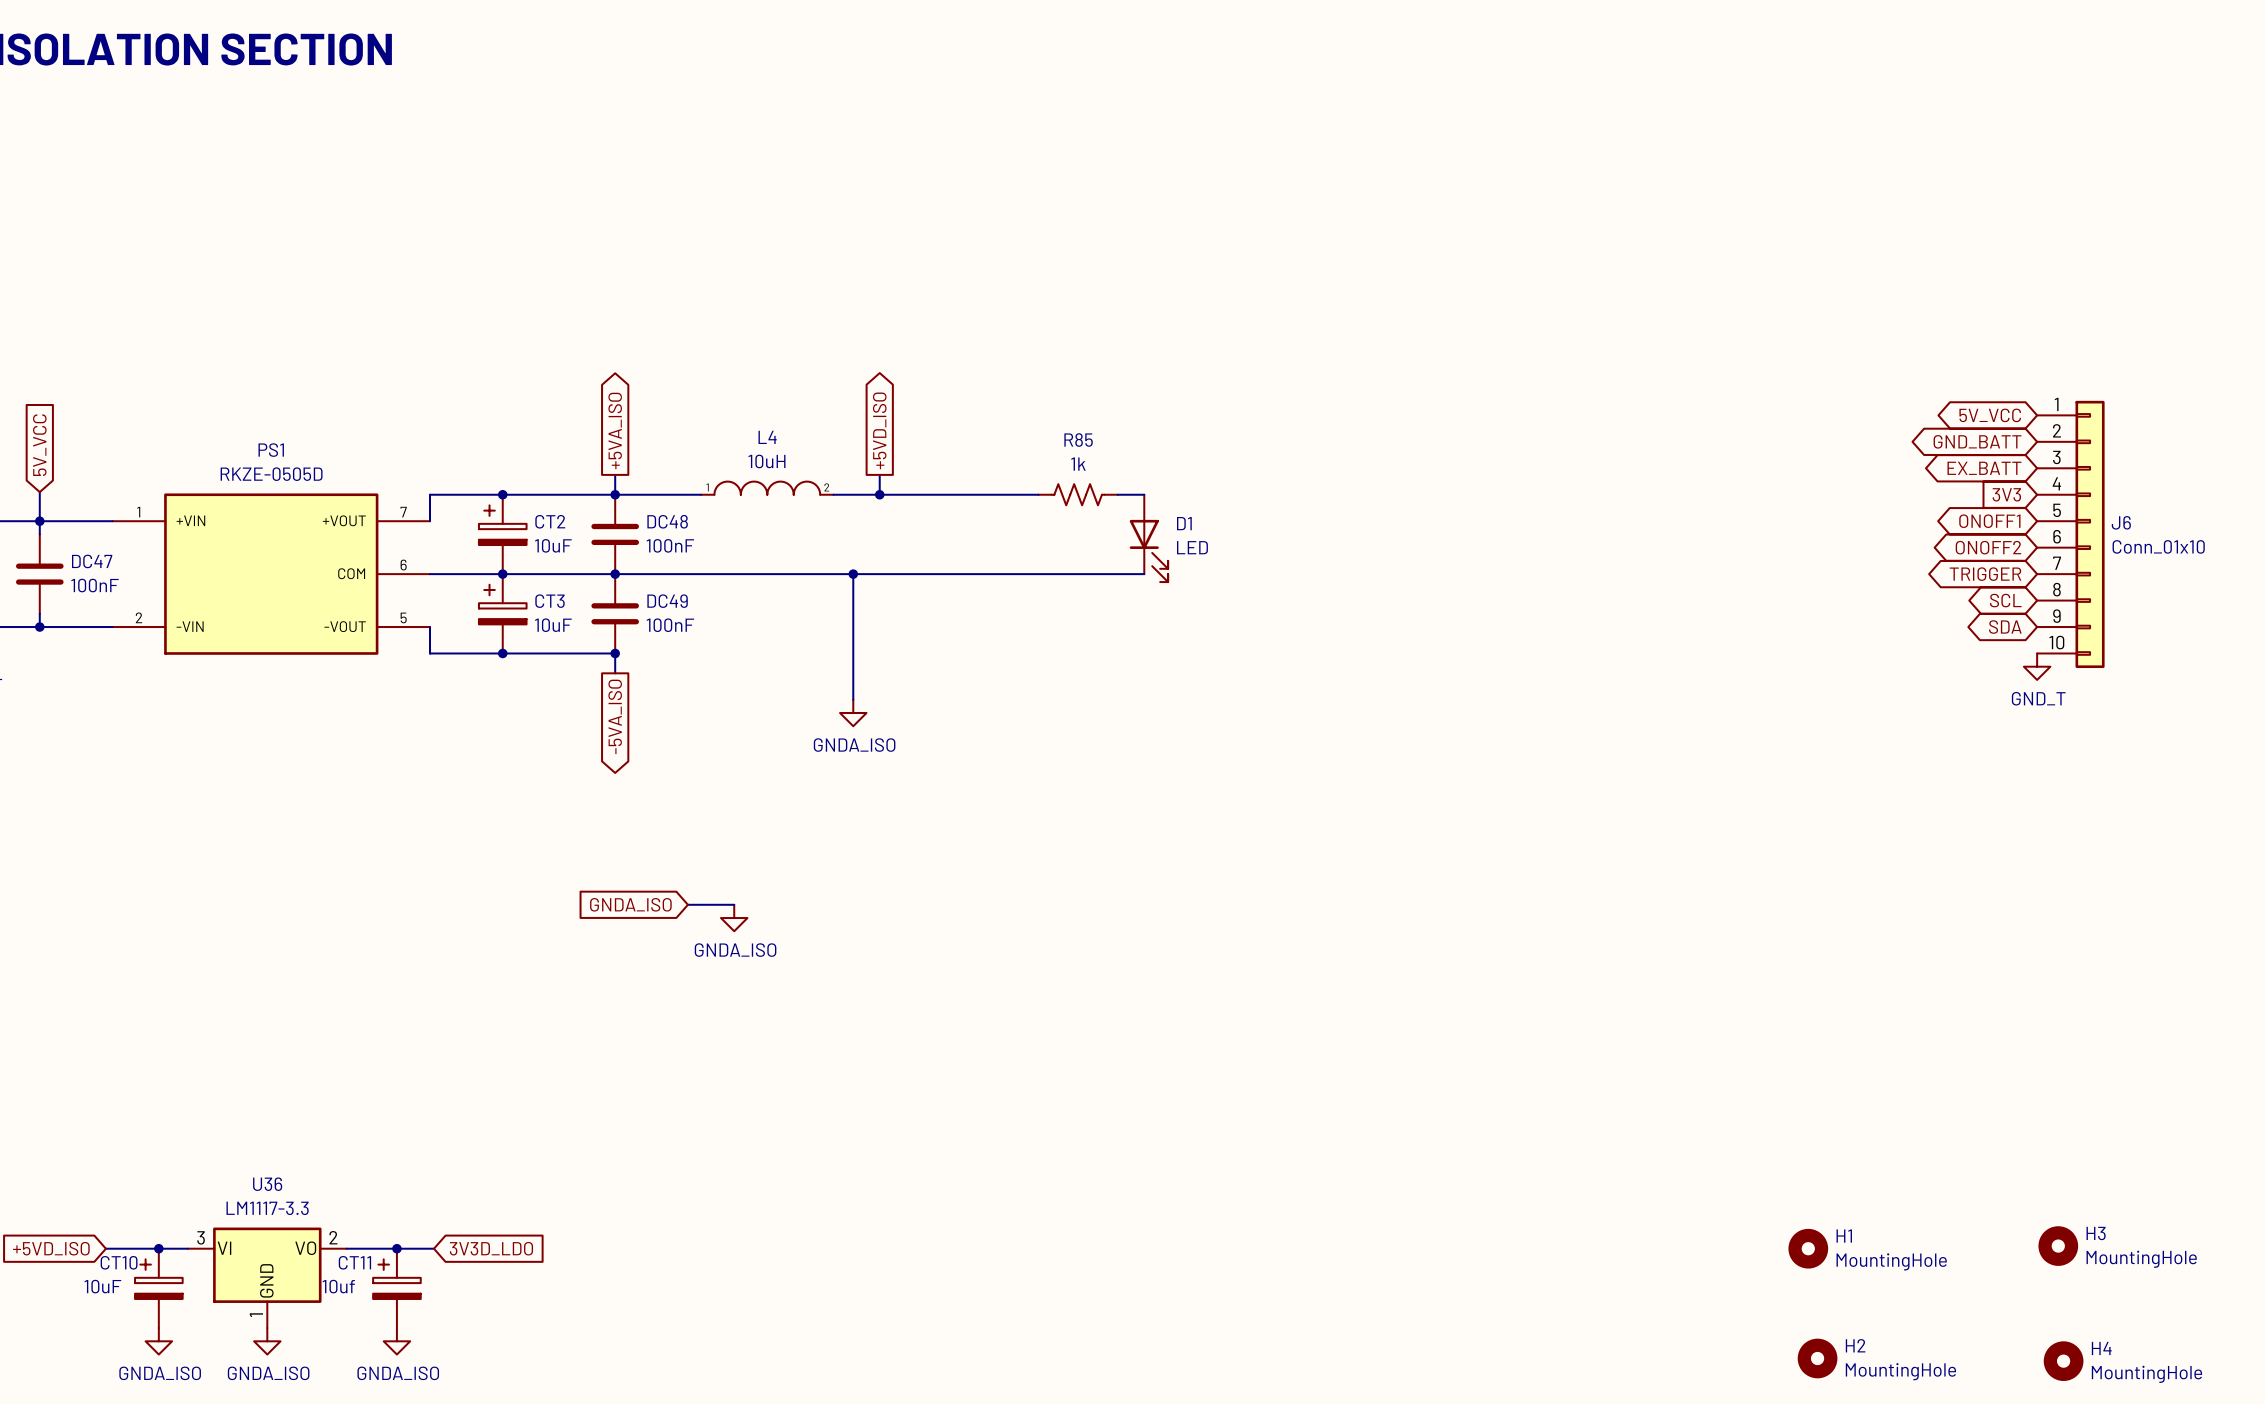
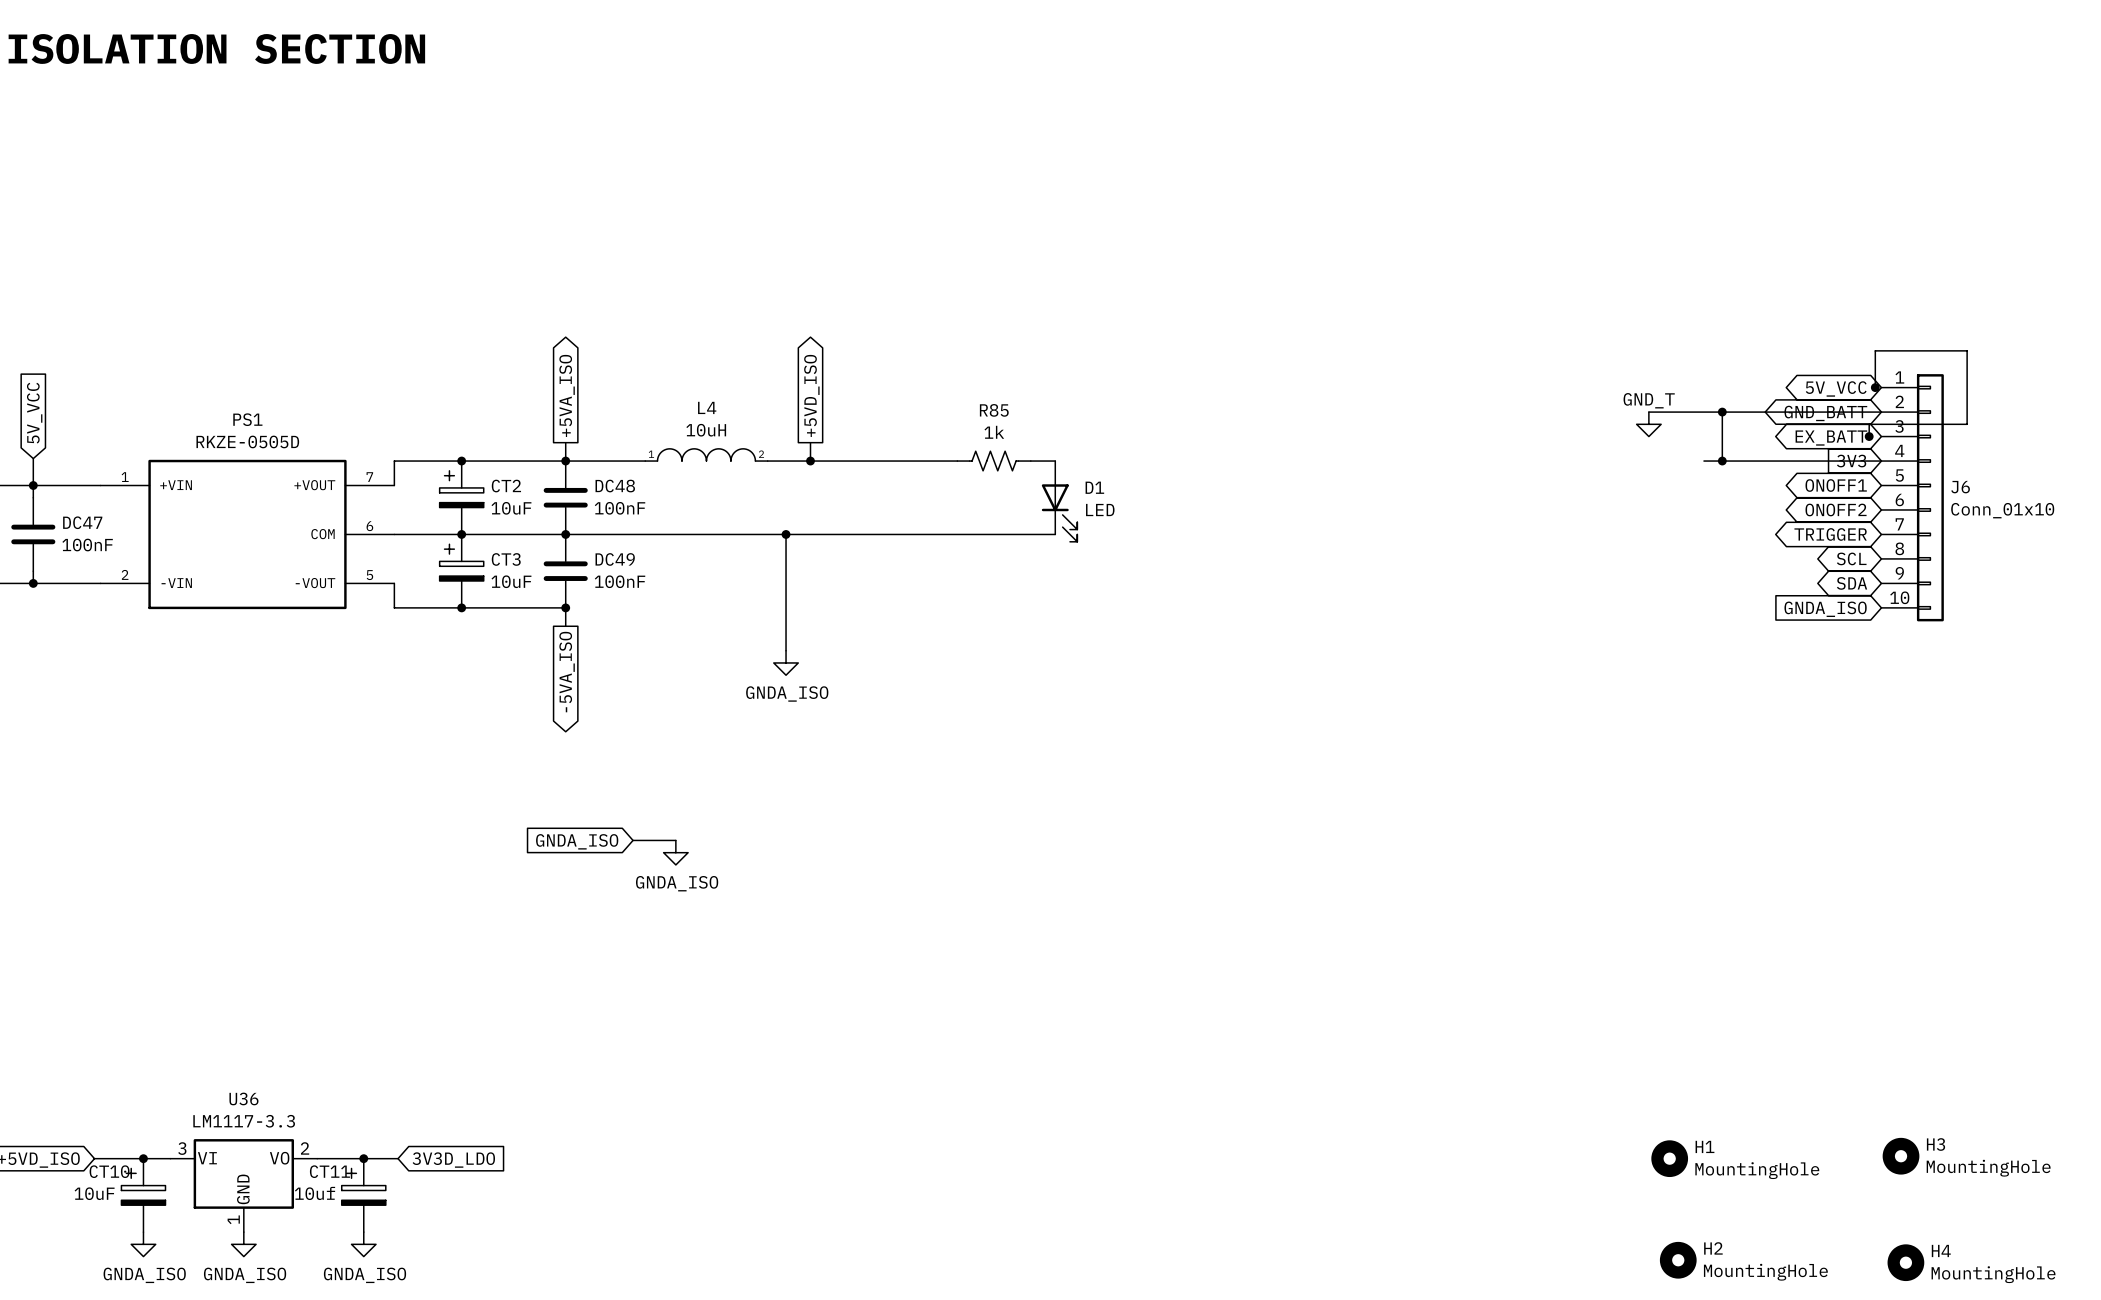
wire: none -> (1875, 387) (1875, 350) (1967, 350) (1967, 424) (1869, 424) (1869, 436)
junction: none -> (1875, 387)
wire: none -> (1648, 412) (1881, 412)
wire: none -> (1722, 412) (1722, 461)
junction: none -> (1722, 412)
power symbol: none -> GND_T (1648, 424)
junction: none -> (1869, 436)
wire: none -> (1703, 461) (1881, 461)
junction: none -> (1722, 461)
global label: none -> GNDA_ISO (1825, 609)
power symbol: GND_T (2037, 666) -> none

